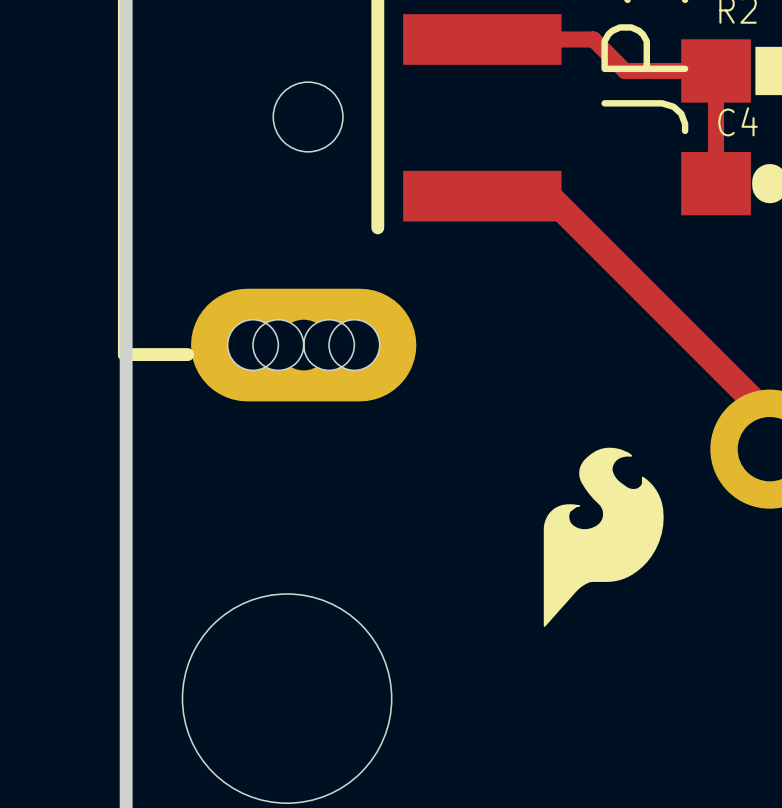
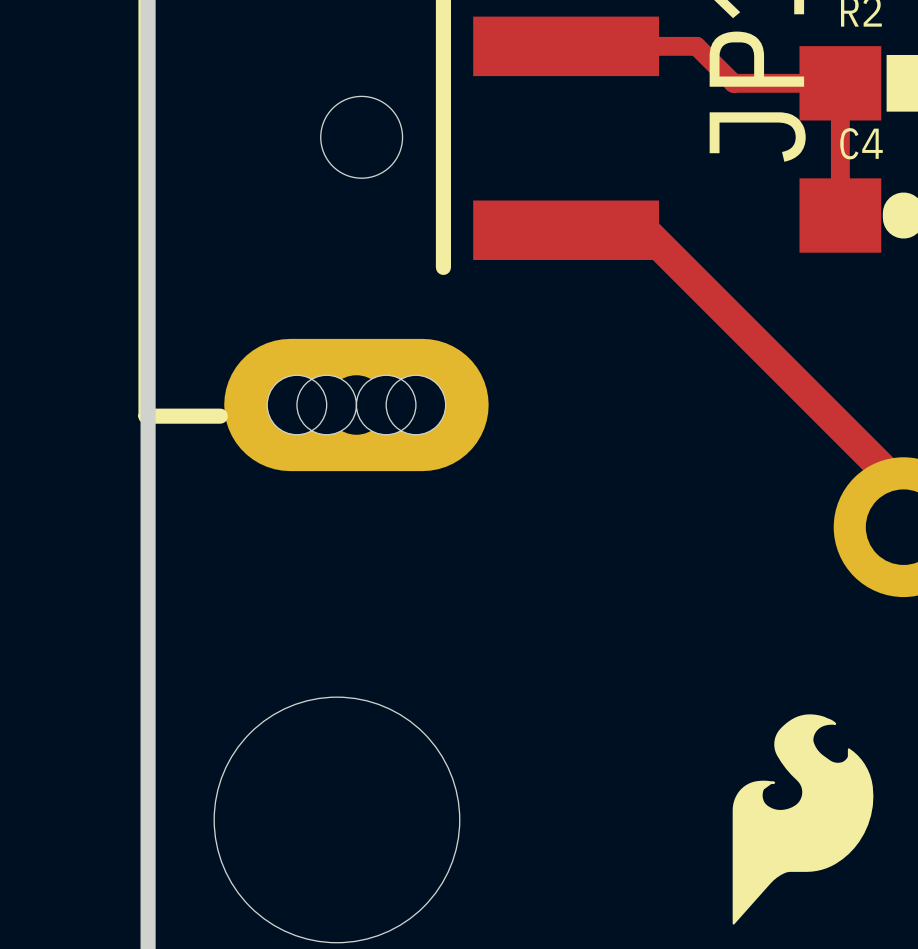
drawing position: (603, 537) -> (803, 819)

